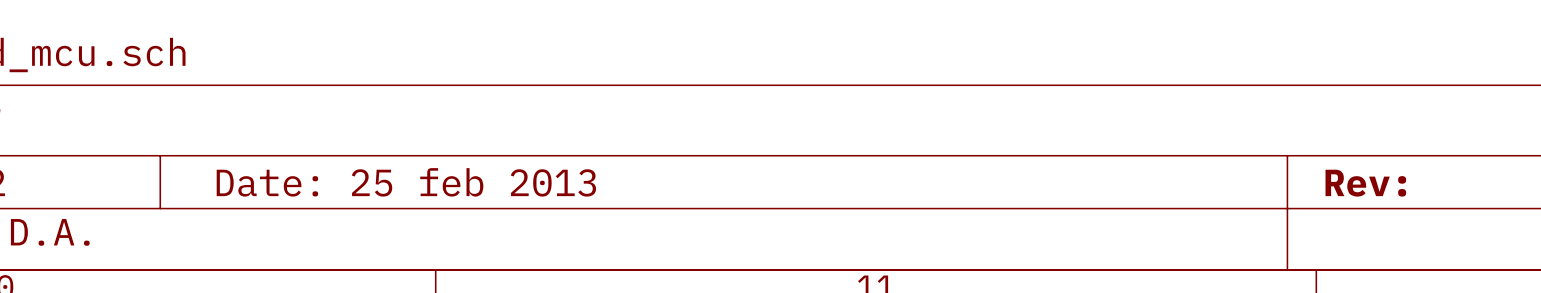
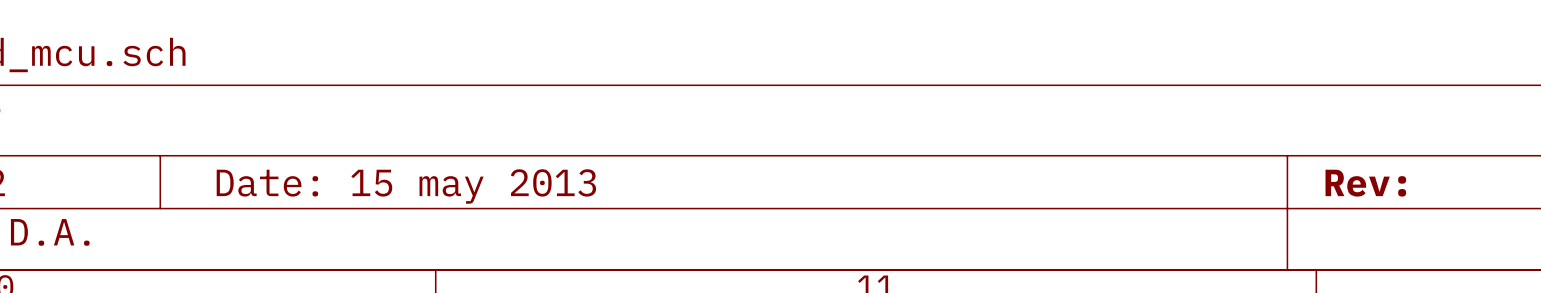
title block: Date: 25 feb 2013 (406, 182) -> Date: 15 may 2013 (406, 186)

